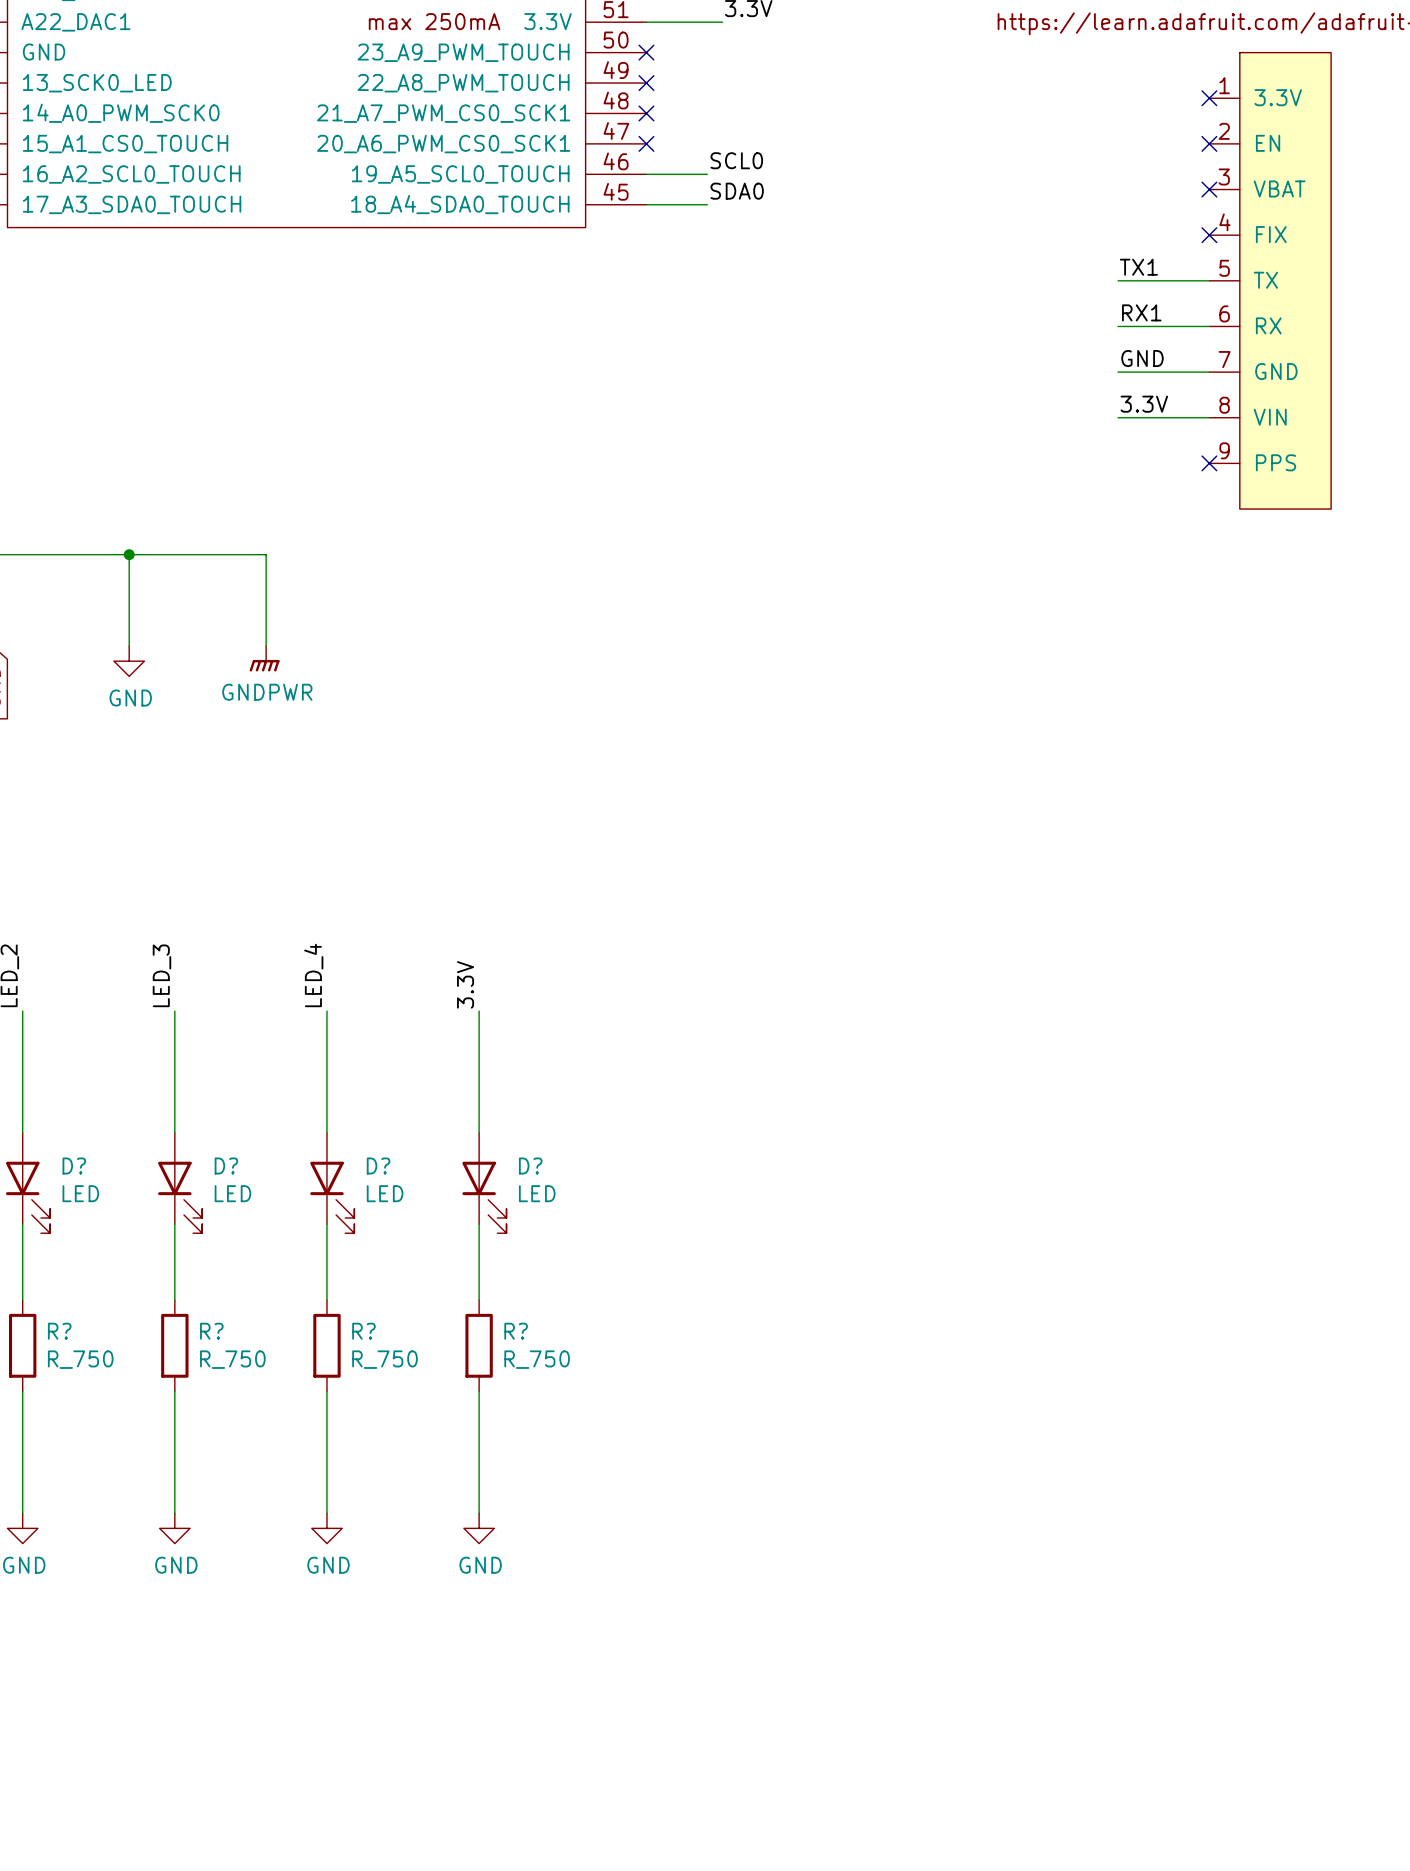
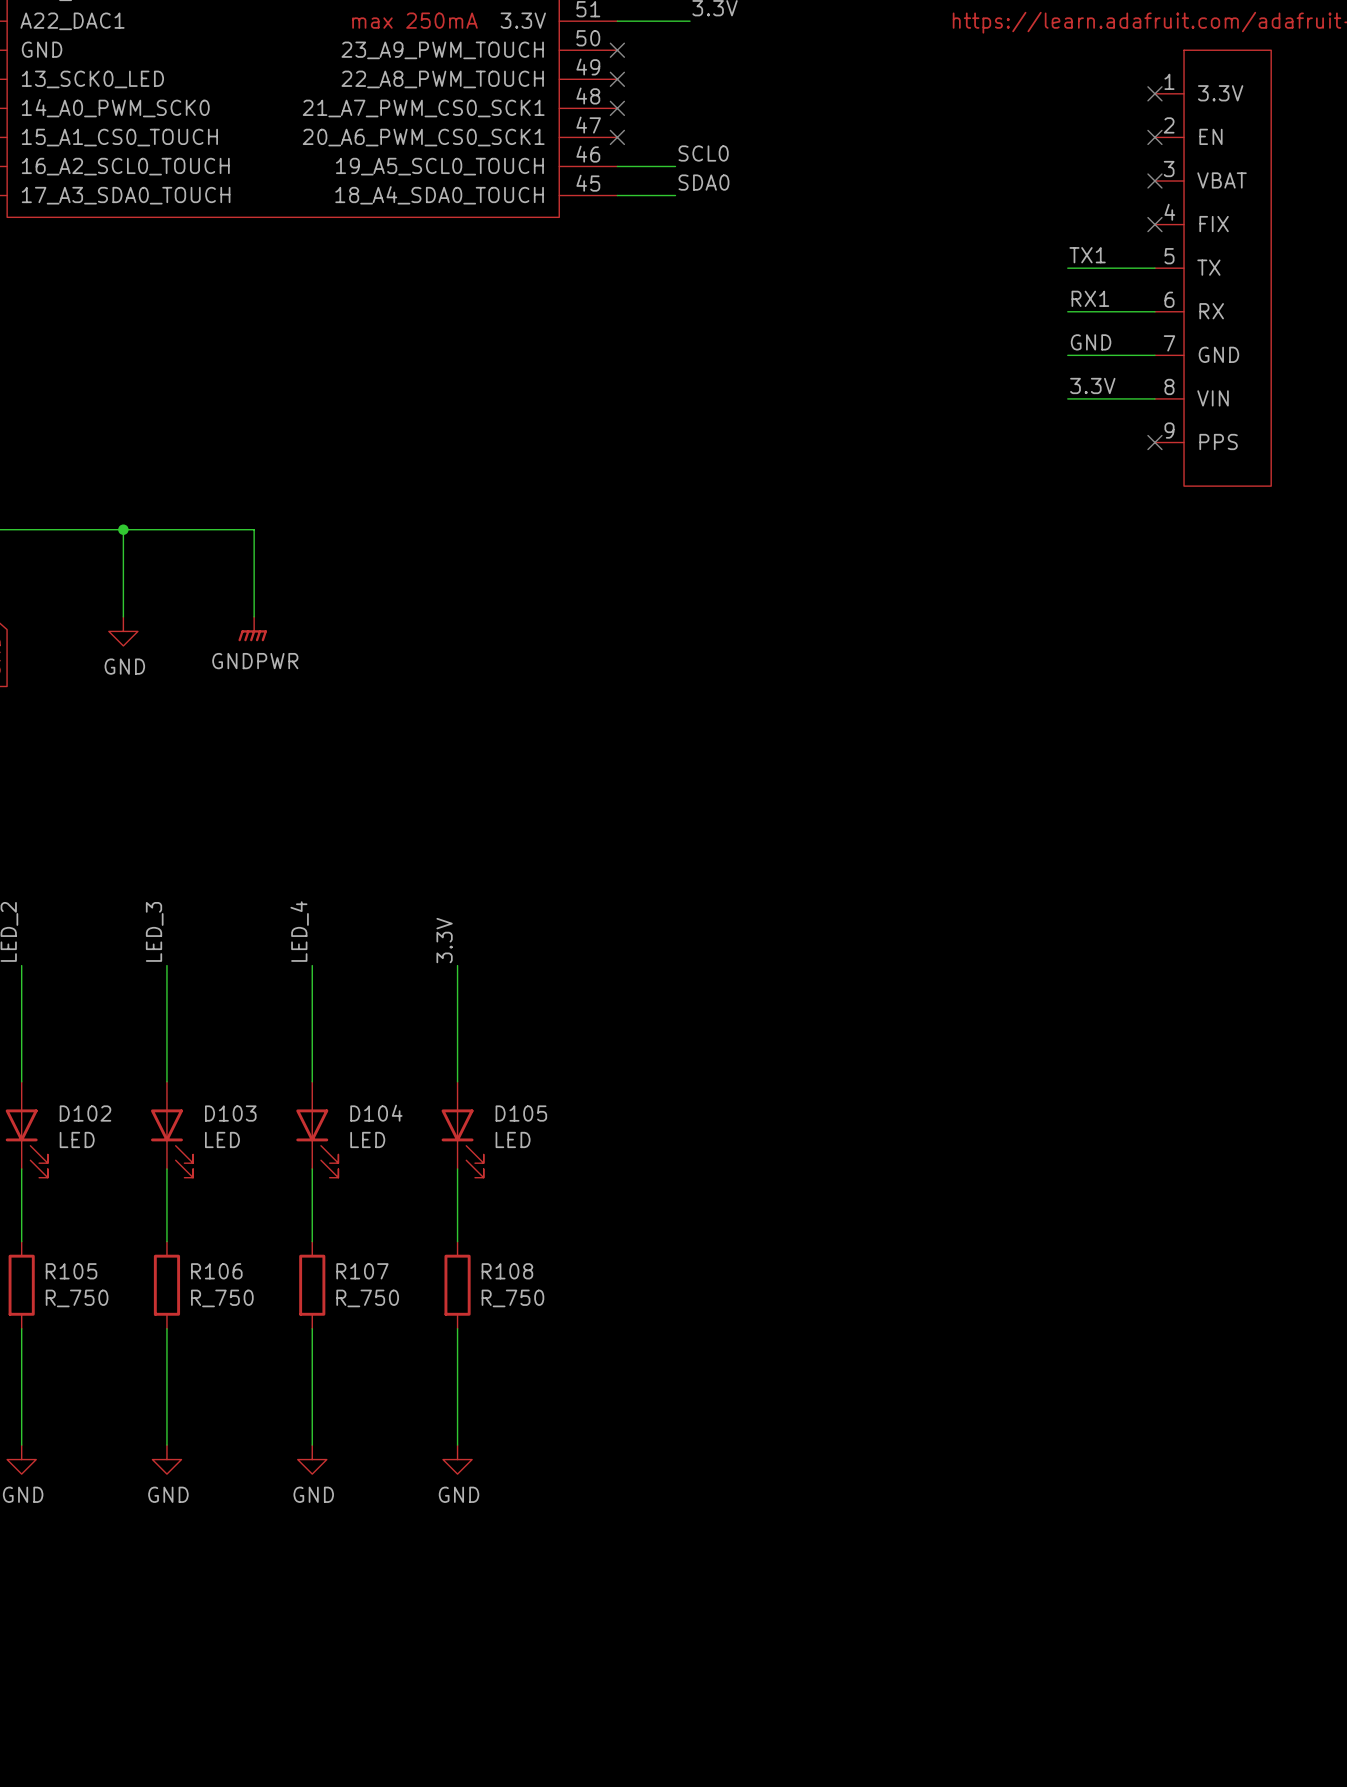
D? name: D? (74, 1166) -> D102 (85, 1113)
D? name: D? (226, 1166) -> D103 (230, 1113)
D? name: D? (378, 1166) -> D104 (376, 1113)
D? name: D? (530, 1166) -> D105 (521, 1113)
R? name: R? (59, 1331) -> R105 (71, 1271)
R? name: R? (211, 1331) -> R106 (216, 1271)
R? name: R? (363, 1331) -> R107 (362, 1271)
R? name: R? (516, 1331) -> R108 (507, 1271)

